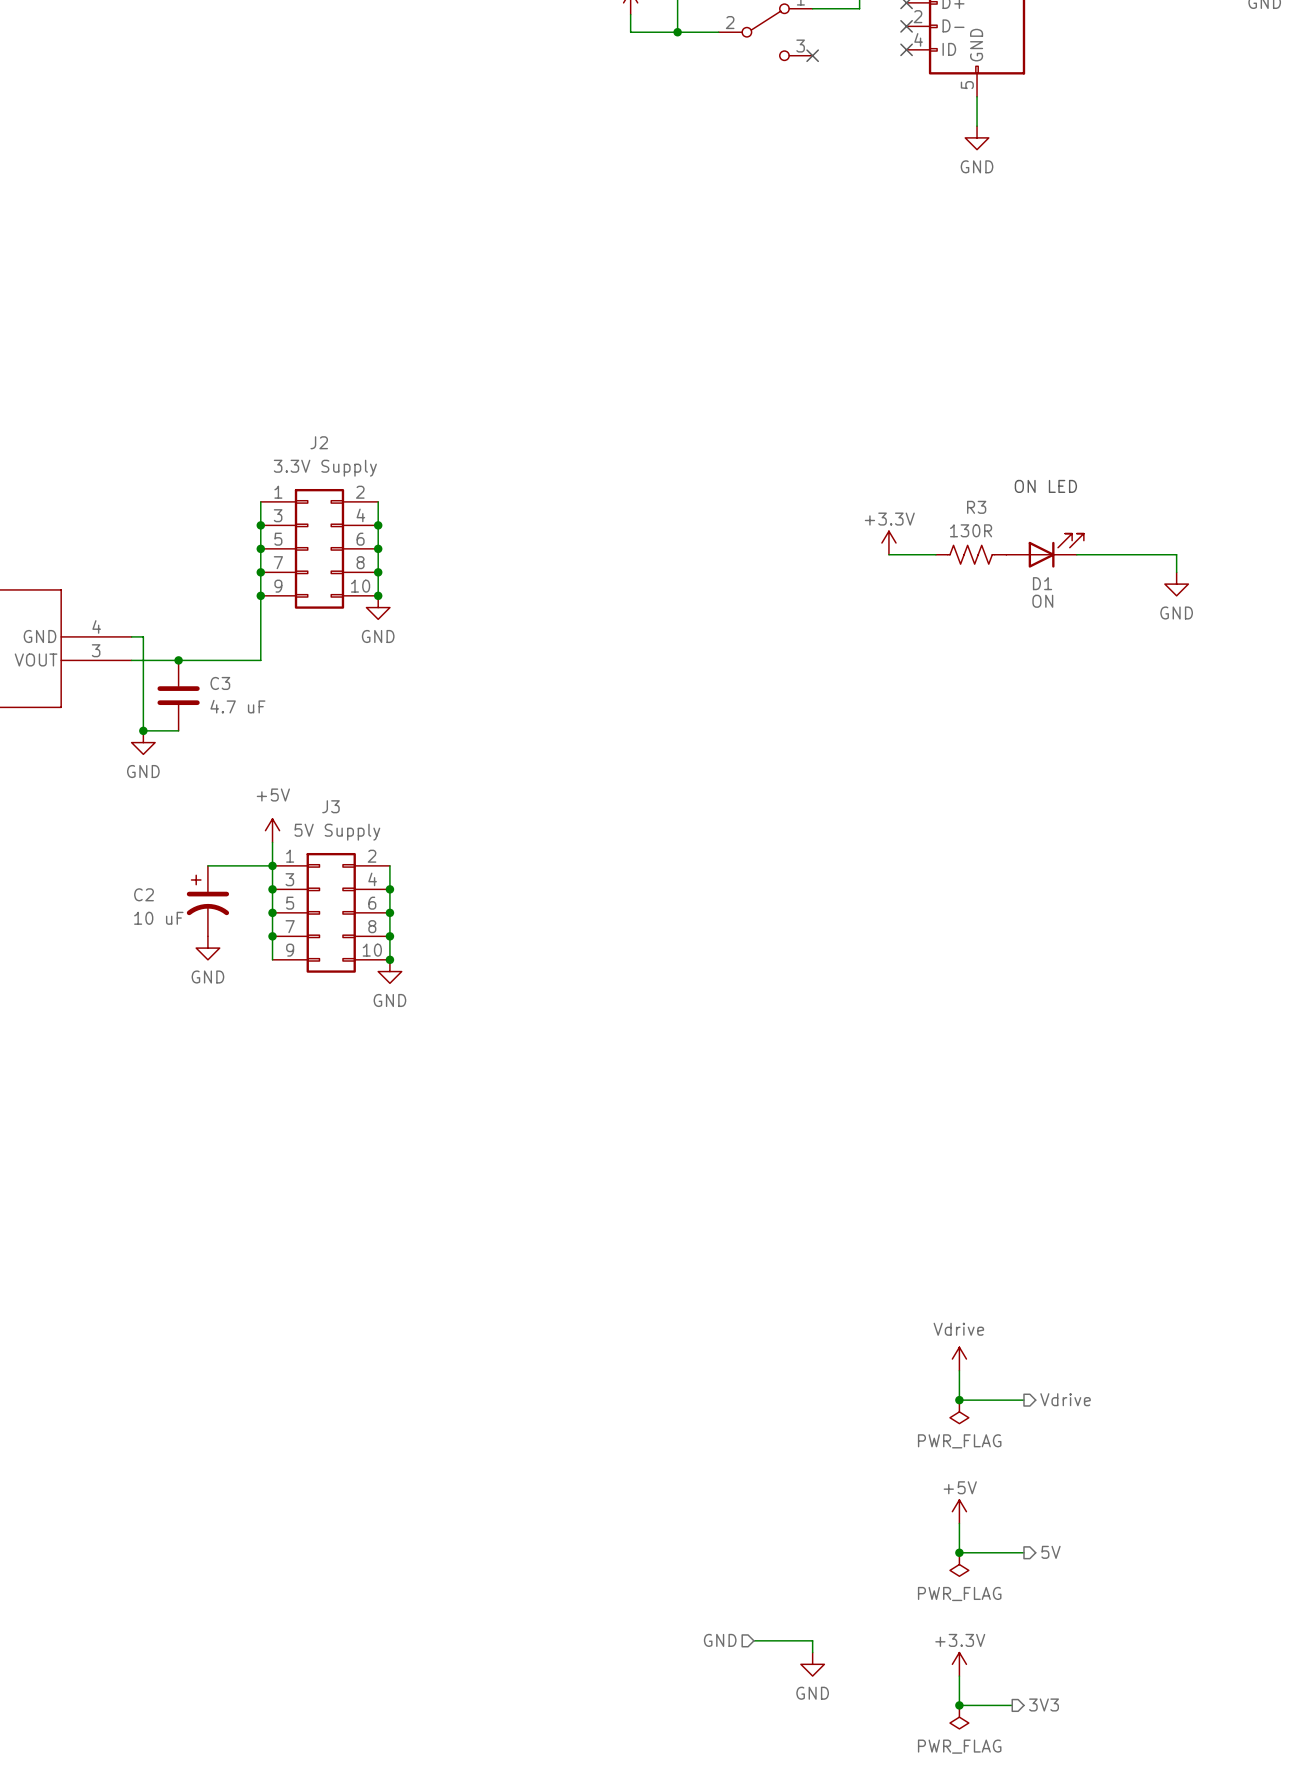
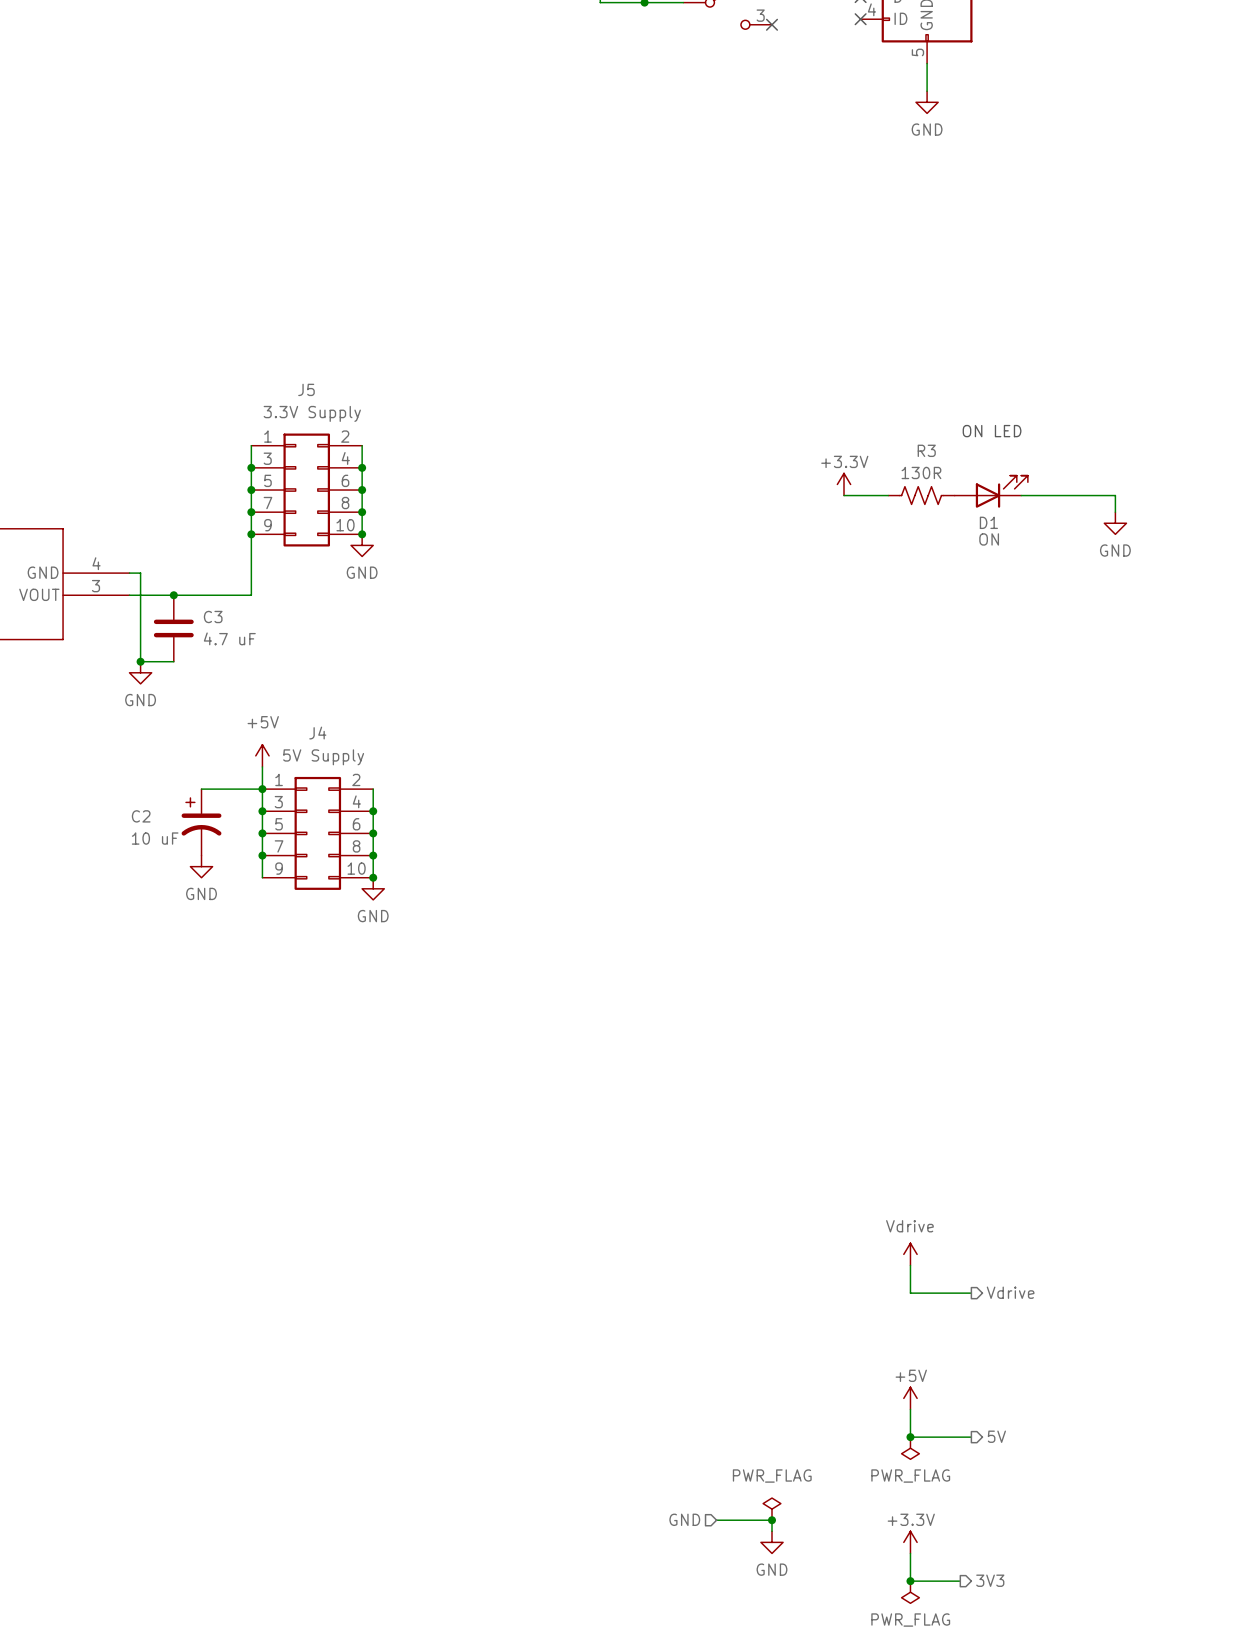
J2 name: J2 (319, 442) -> J5 (306, 389)
J3 name: J3 (330, 806) -> J4 (317, 733)
junction: (959, 1400) -> none
power symbol: PWR_FLAG (959, 1411) -> none
power symbol: none -> PWR_FLAG (771, 1509)
junction: none -> (771, 1520)

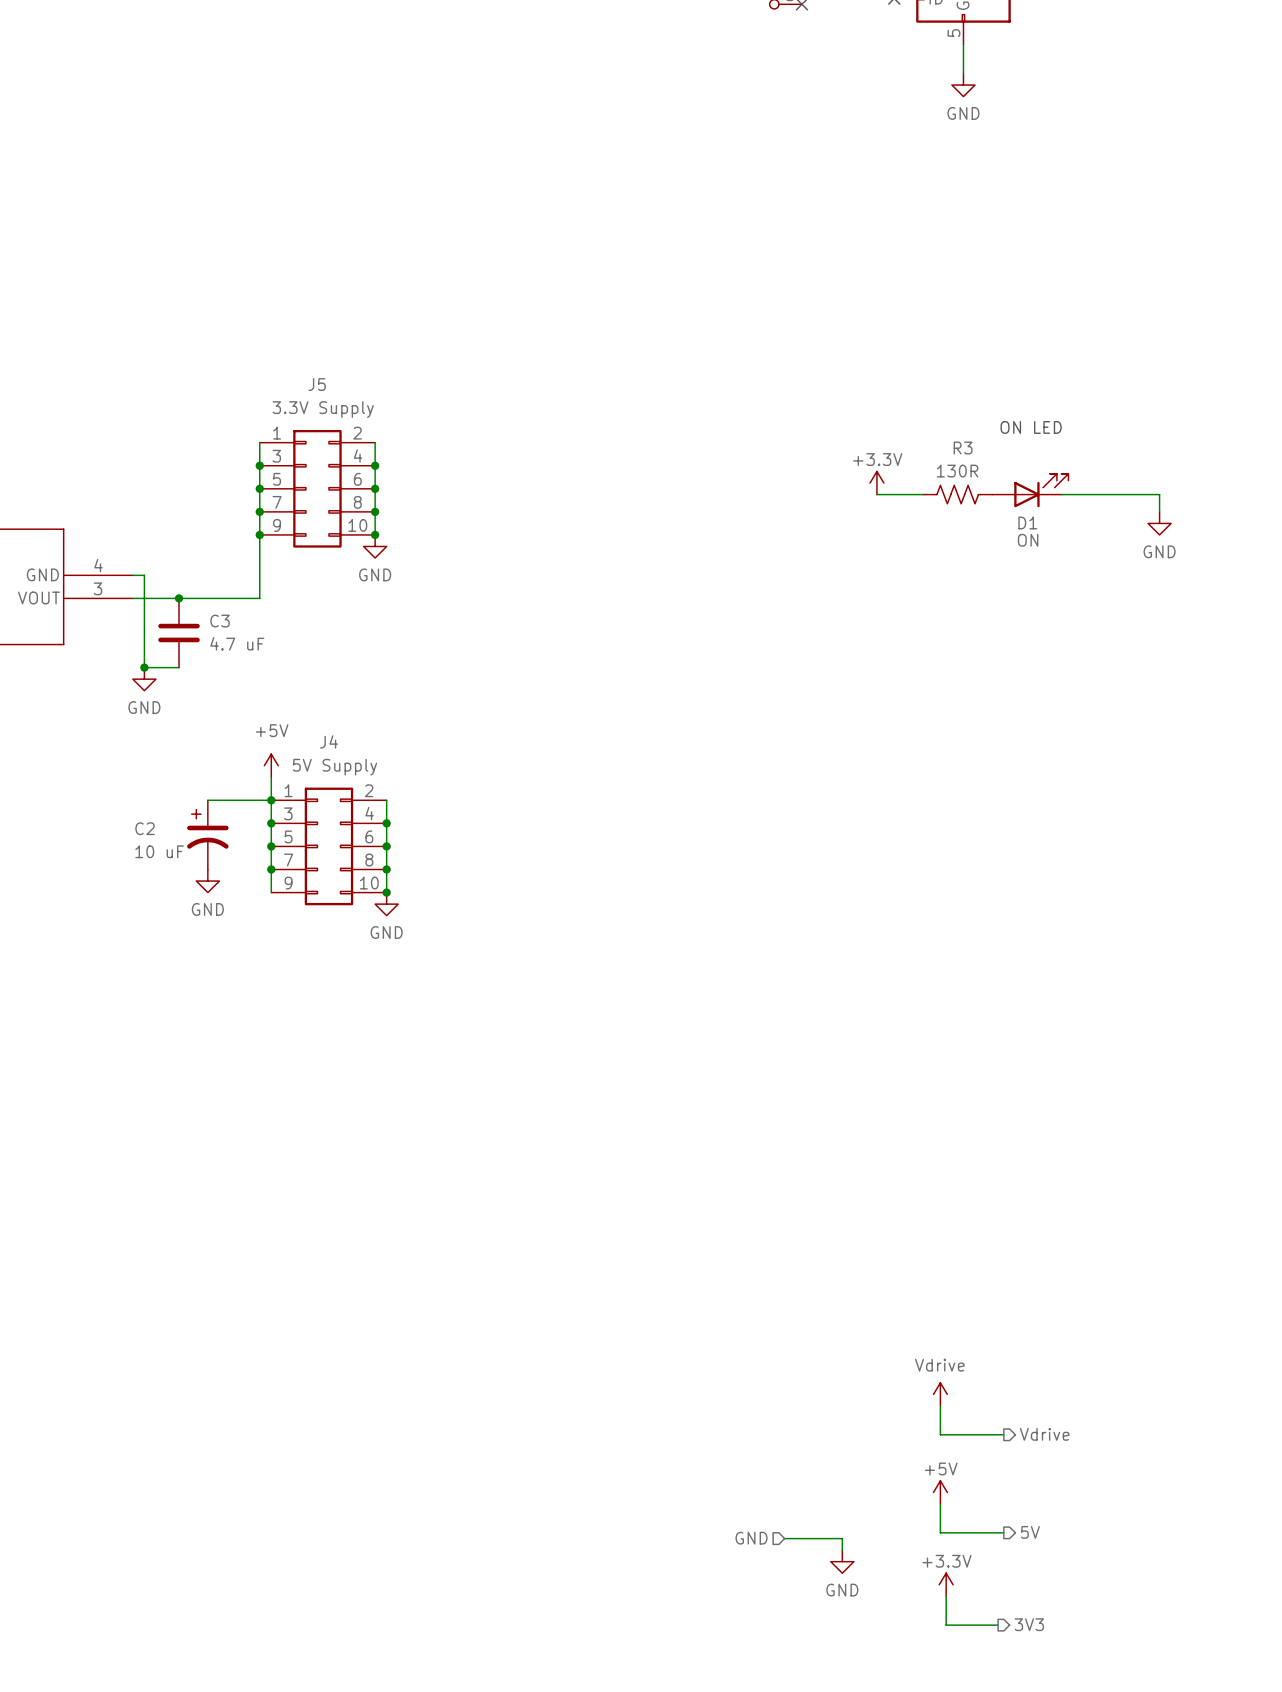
power symbol position: Vdrive (910, 1254) -> Vdrive (940, 1394)
wire: (910, 1265) (910, 1293) (971, 1293) -> (940, 1503) (940, 1532) (1003, 1532)
hierarchical label position: Vdrive (1010, 1292) -> Vdrive (1044, 1434)
power symbol: +5V (910, 1398) -> none
wire: (910, 1409) (910, 1437) (971, 1437) -> (940, 1405) (940, 1434) (1003, 1434)
hierarchical label position: 5V (996, 1436) -> 5V (1030, 1532)
junction: (910, 1437) -> none
power symbol: PWR_FLAG (910, 1448) -> +5V (940, 1492)
power symbol: PWR_FLAG (771, 1509) -> none
hierarchical label position: GND (684, 1519) -> GND (751, 1538)
wire: (716, 1520) (771, 1520) (771, 1531) -> (784, 1538) (842, 1538) (842, 1550)
junction: (771, 1520) -> none
power symbol position: GND (771, 1542) -> GND (842, 1561)
junction: (910, 1581) -> none
power symbol: PWR_FLAG (910, 1592) -> none

